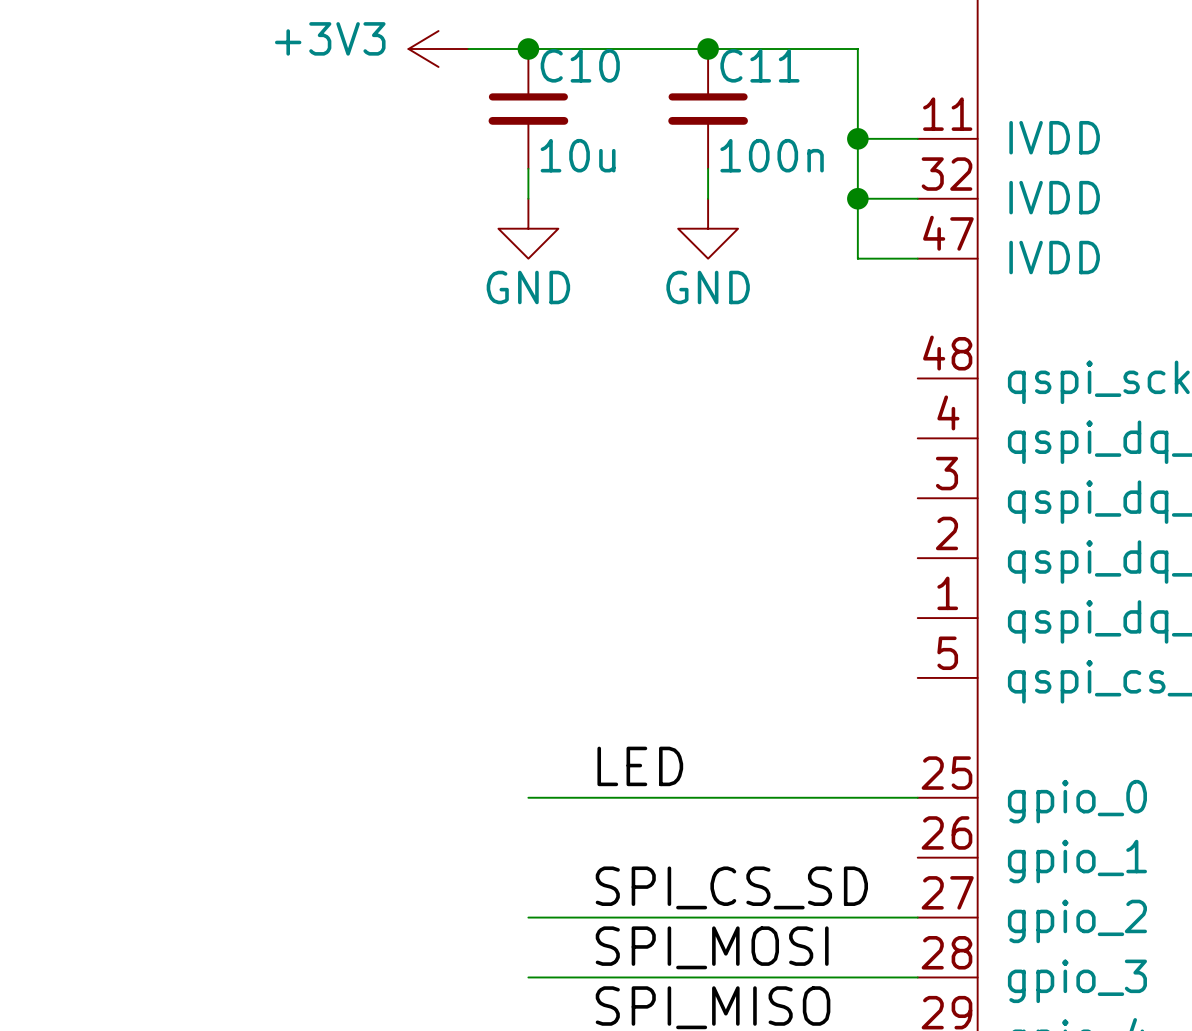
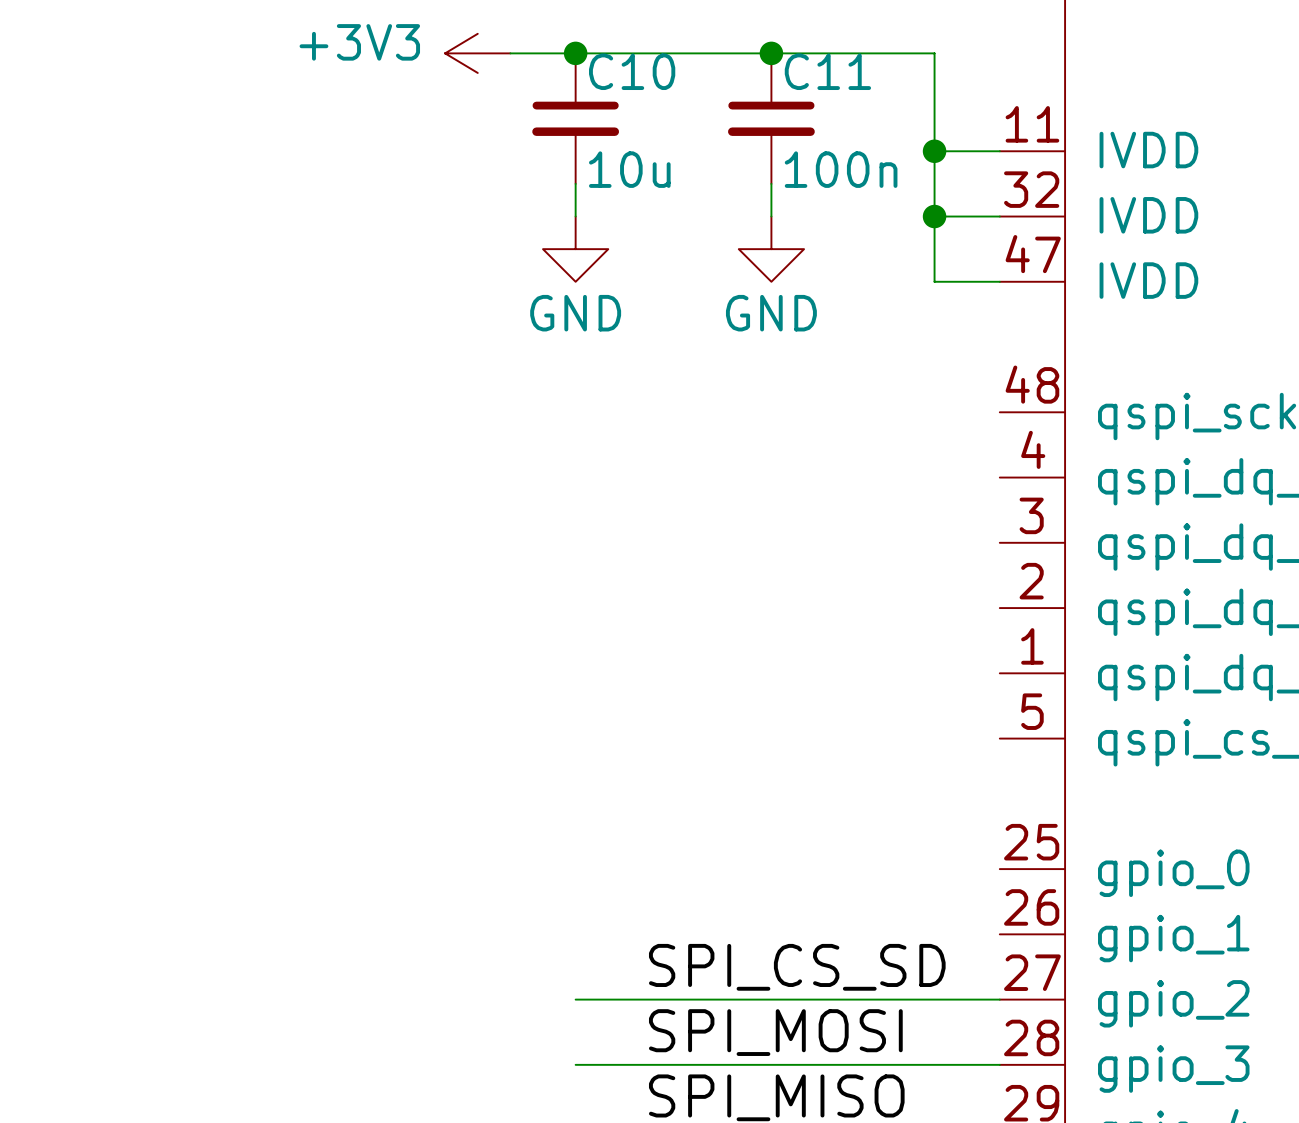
label: LED (640, 766) -> none
wire: (528, 797) (917, 797) -> none

